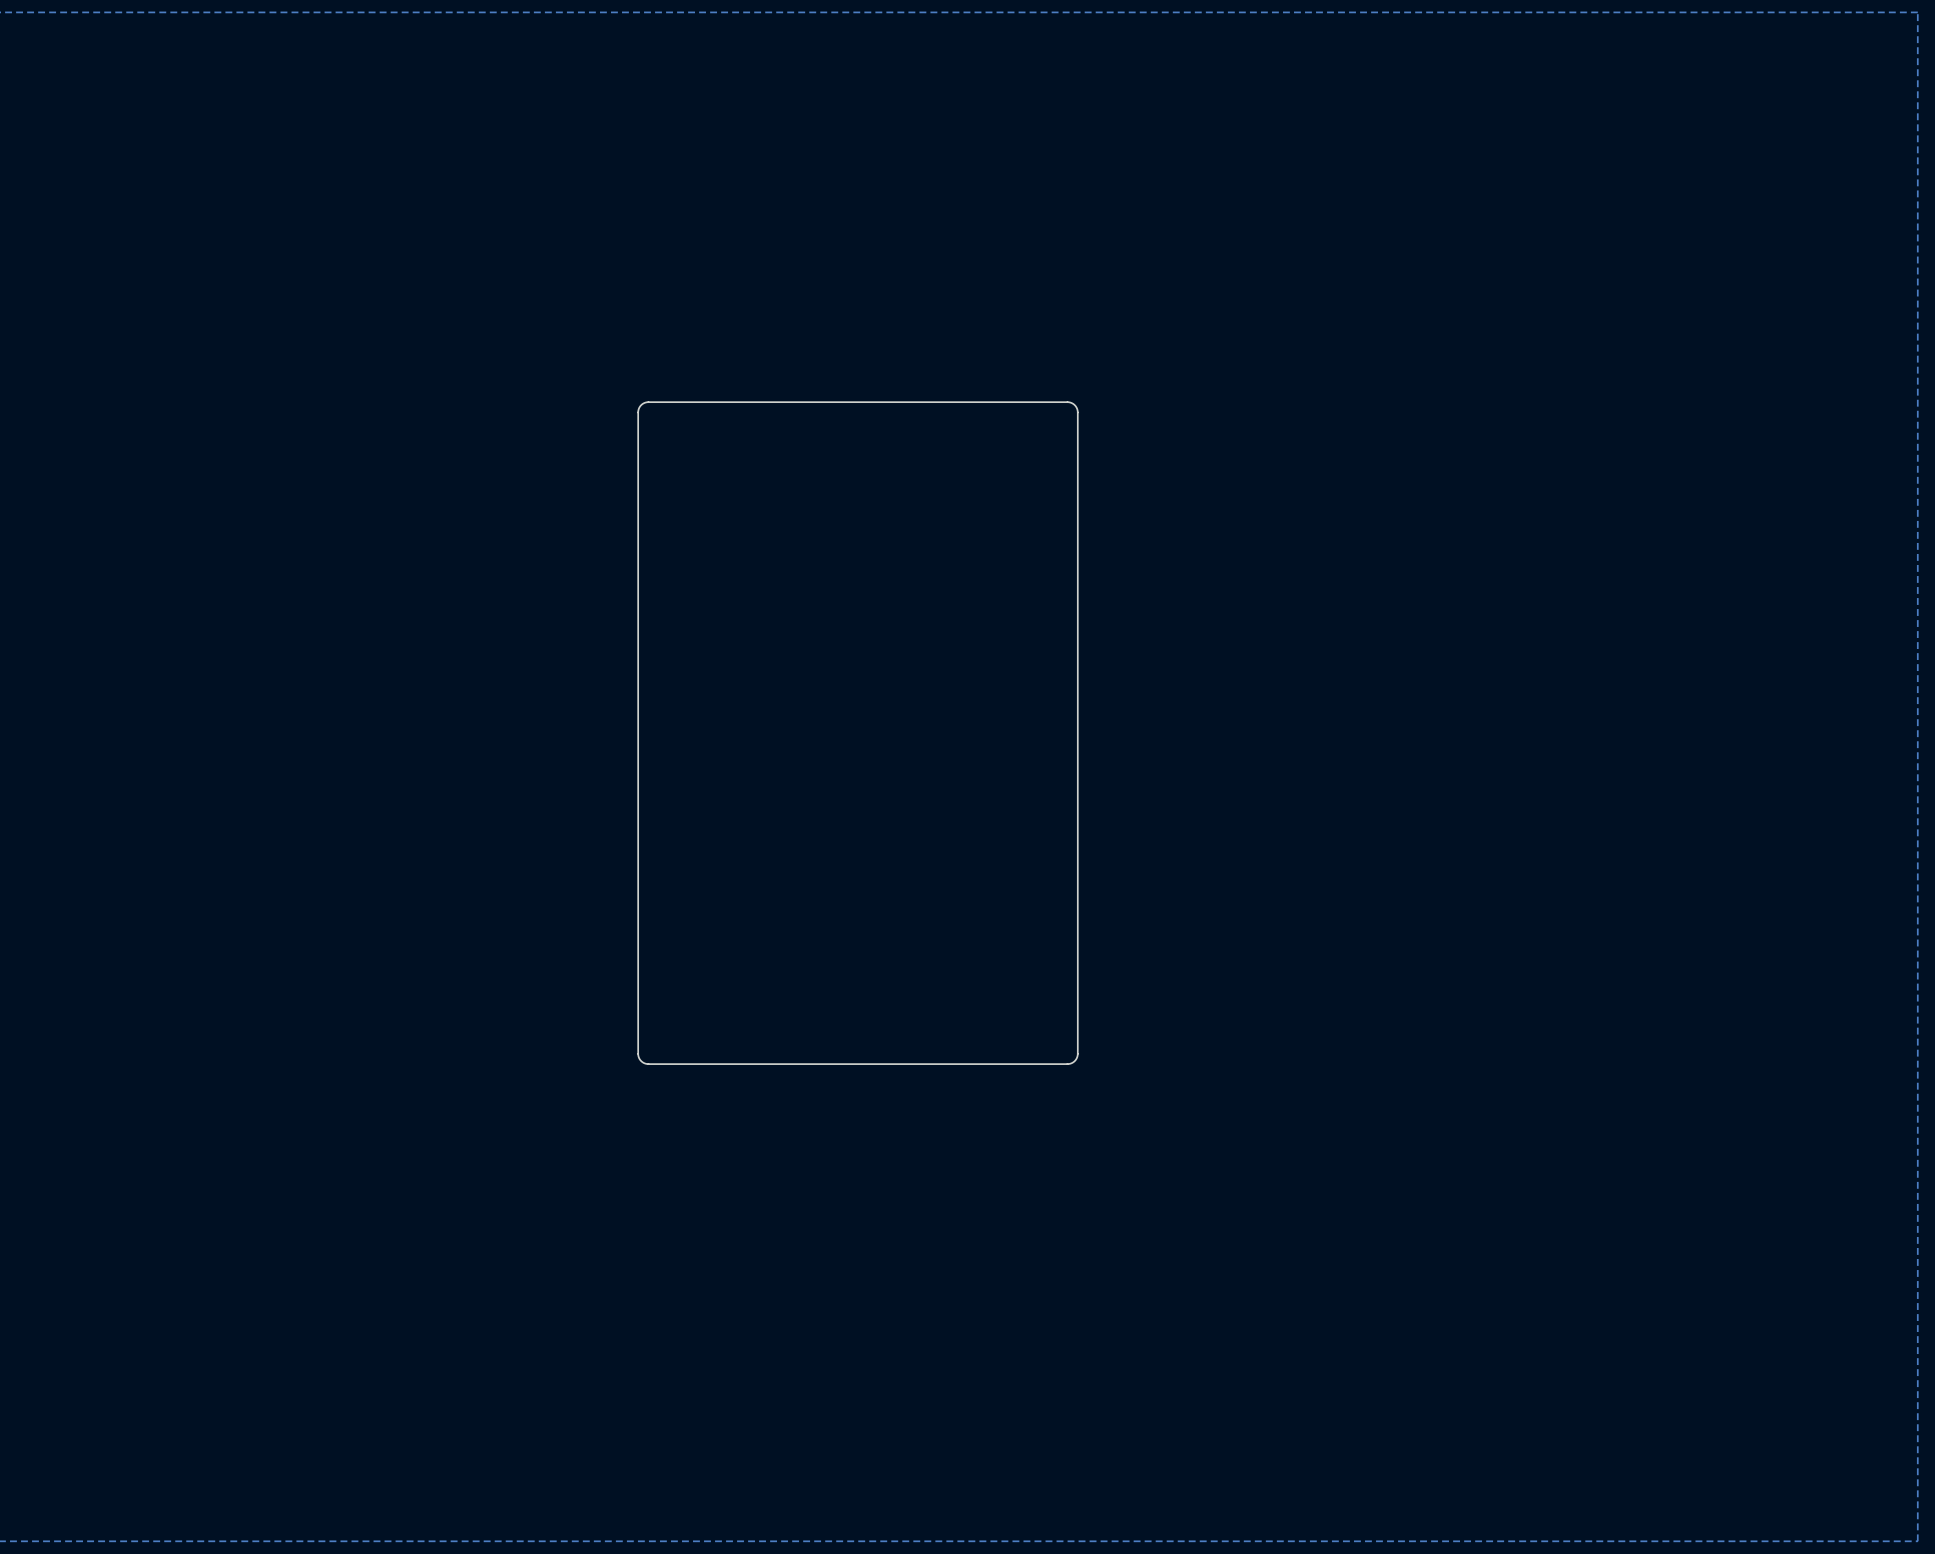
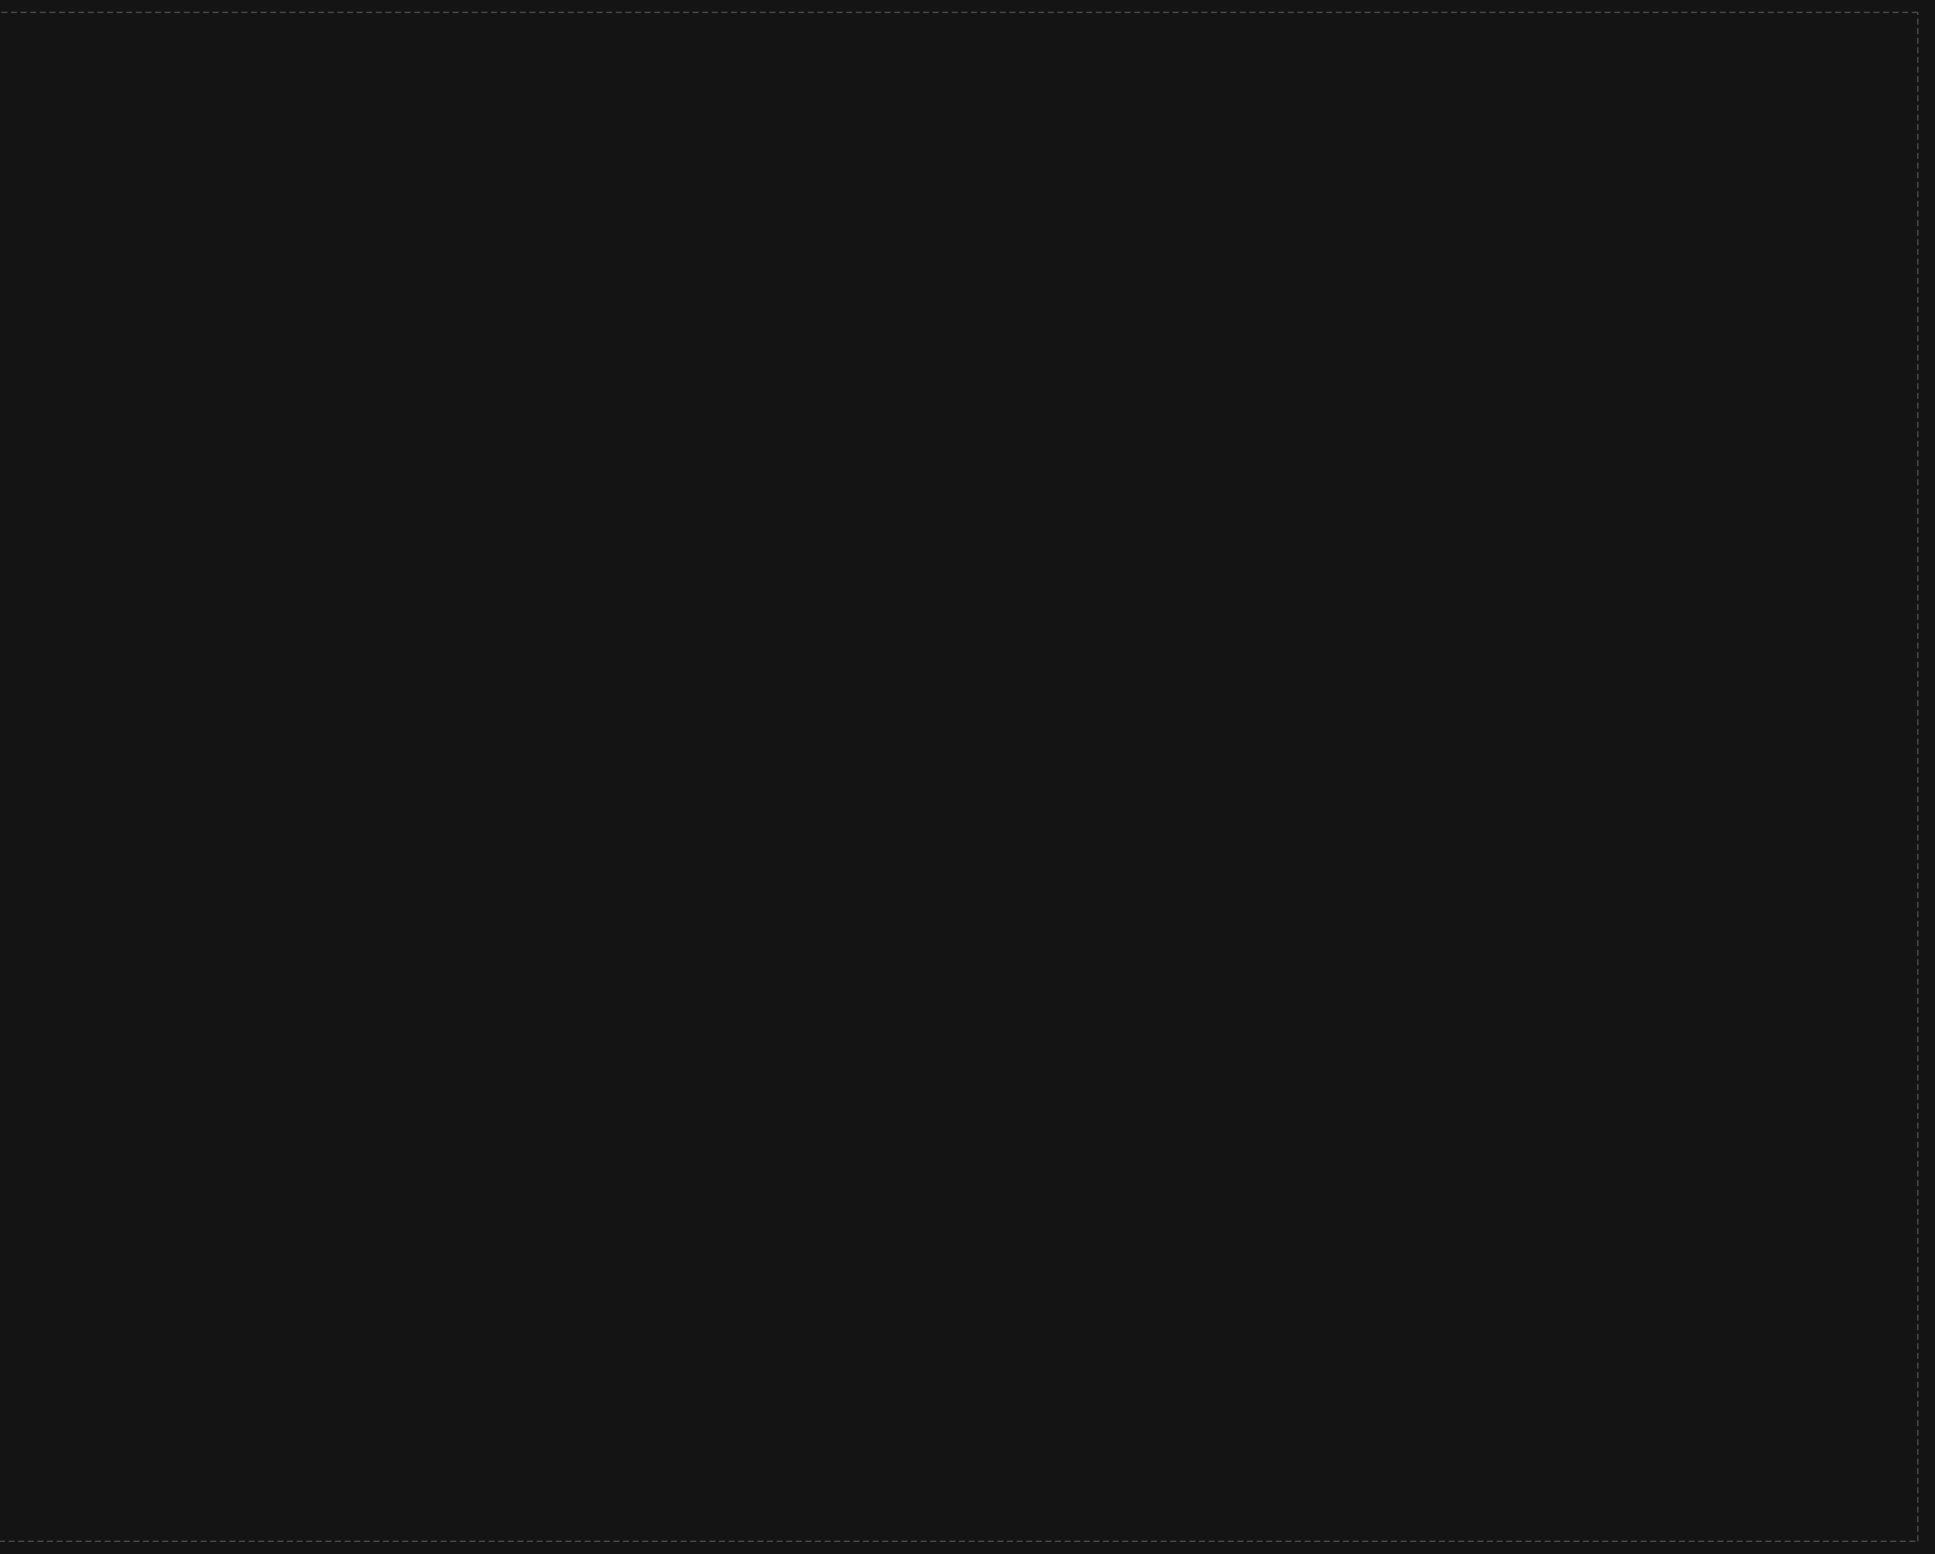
board edge: (1067, 402) (648, 402) (639, 406) (638, 412) (638, 1053) (642, 1062) (648, 1064) (1067, 1064) (1076, 1059) (1077, 1053) (1077, 412) (1074, 405) (1067, 402) -> none

